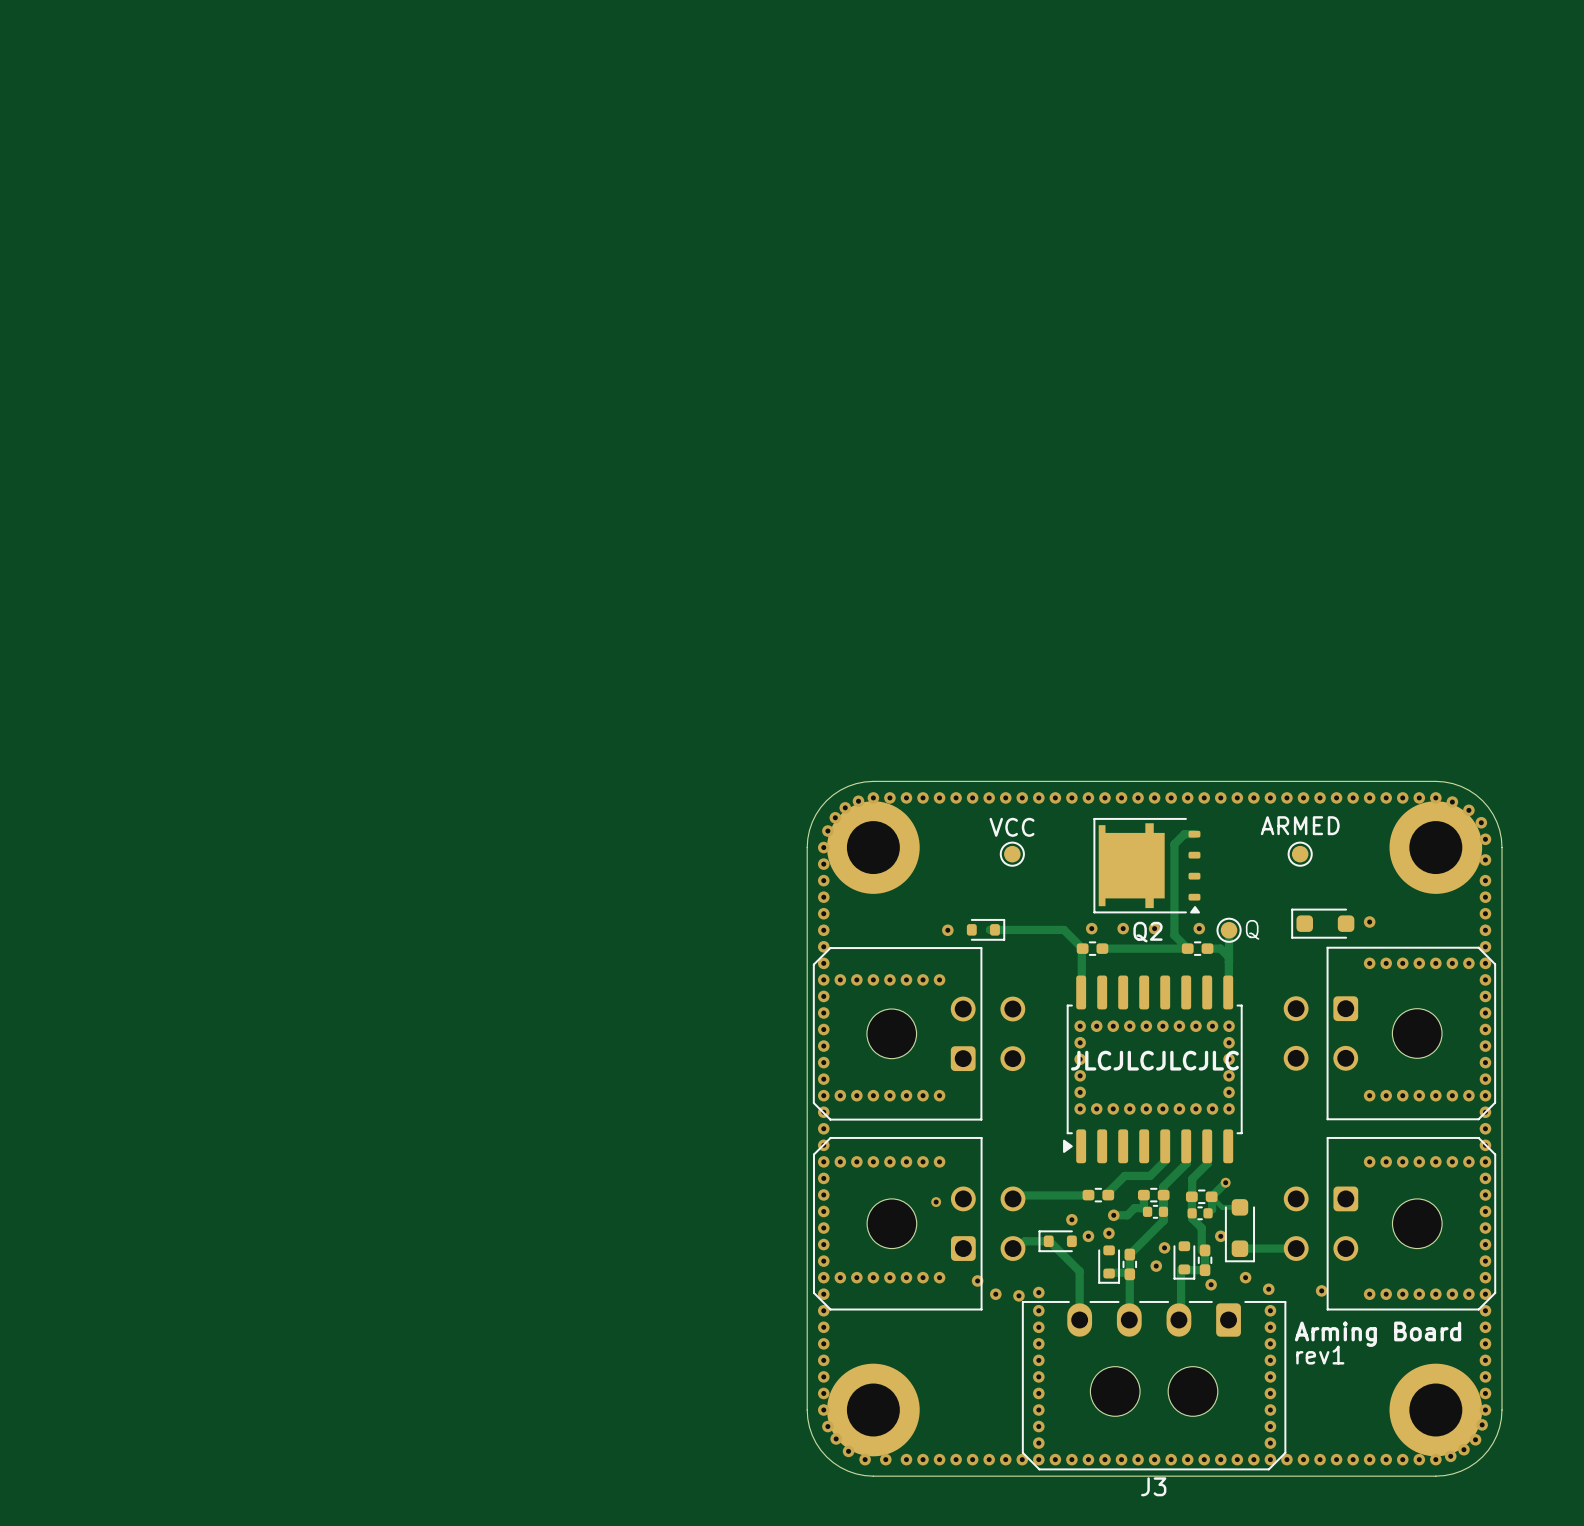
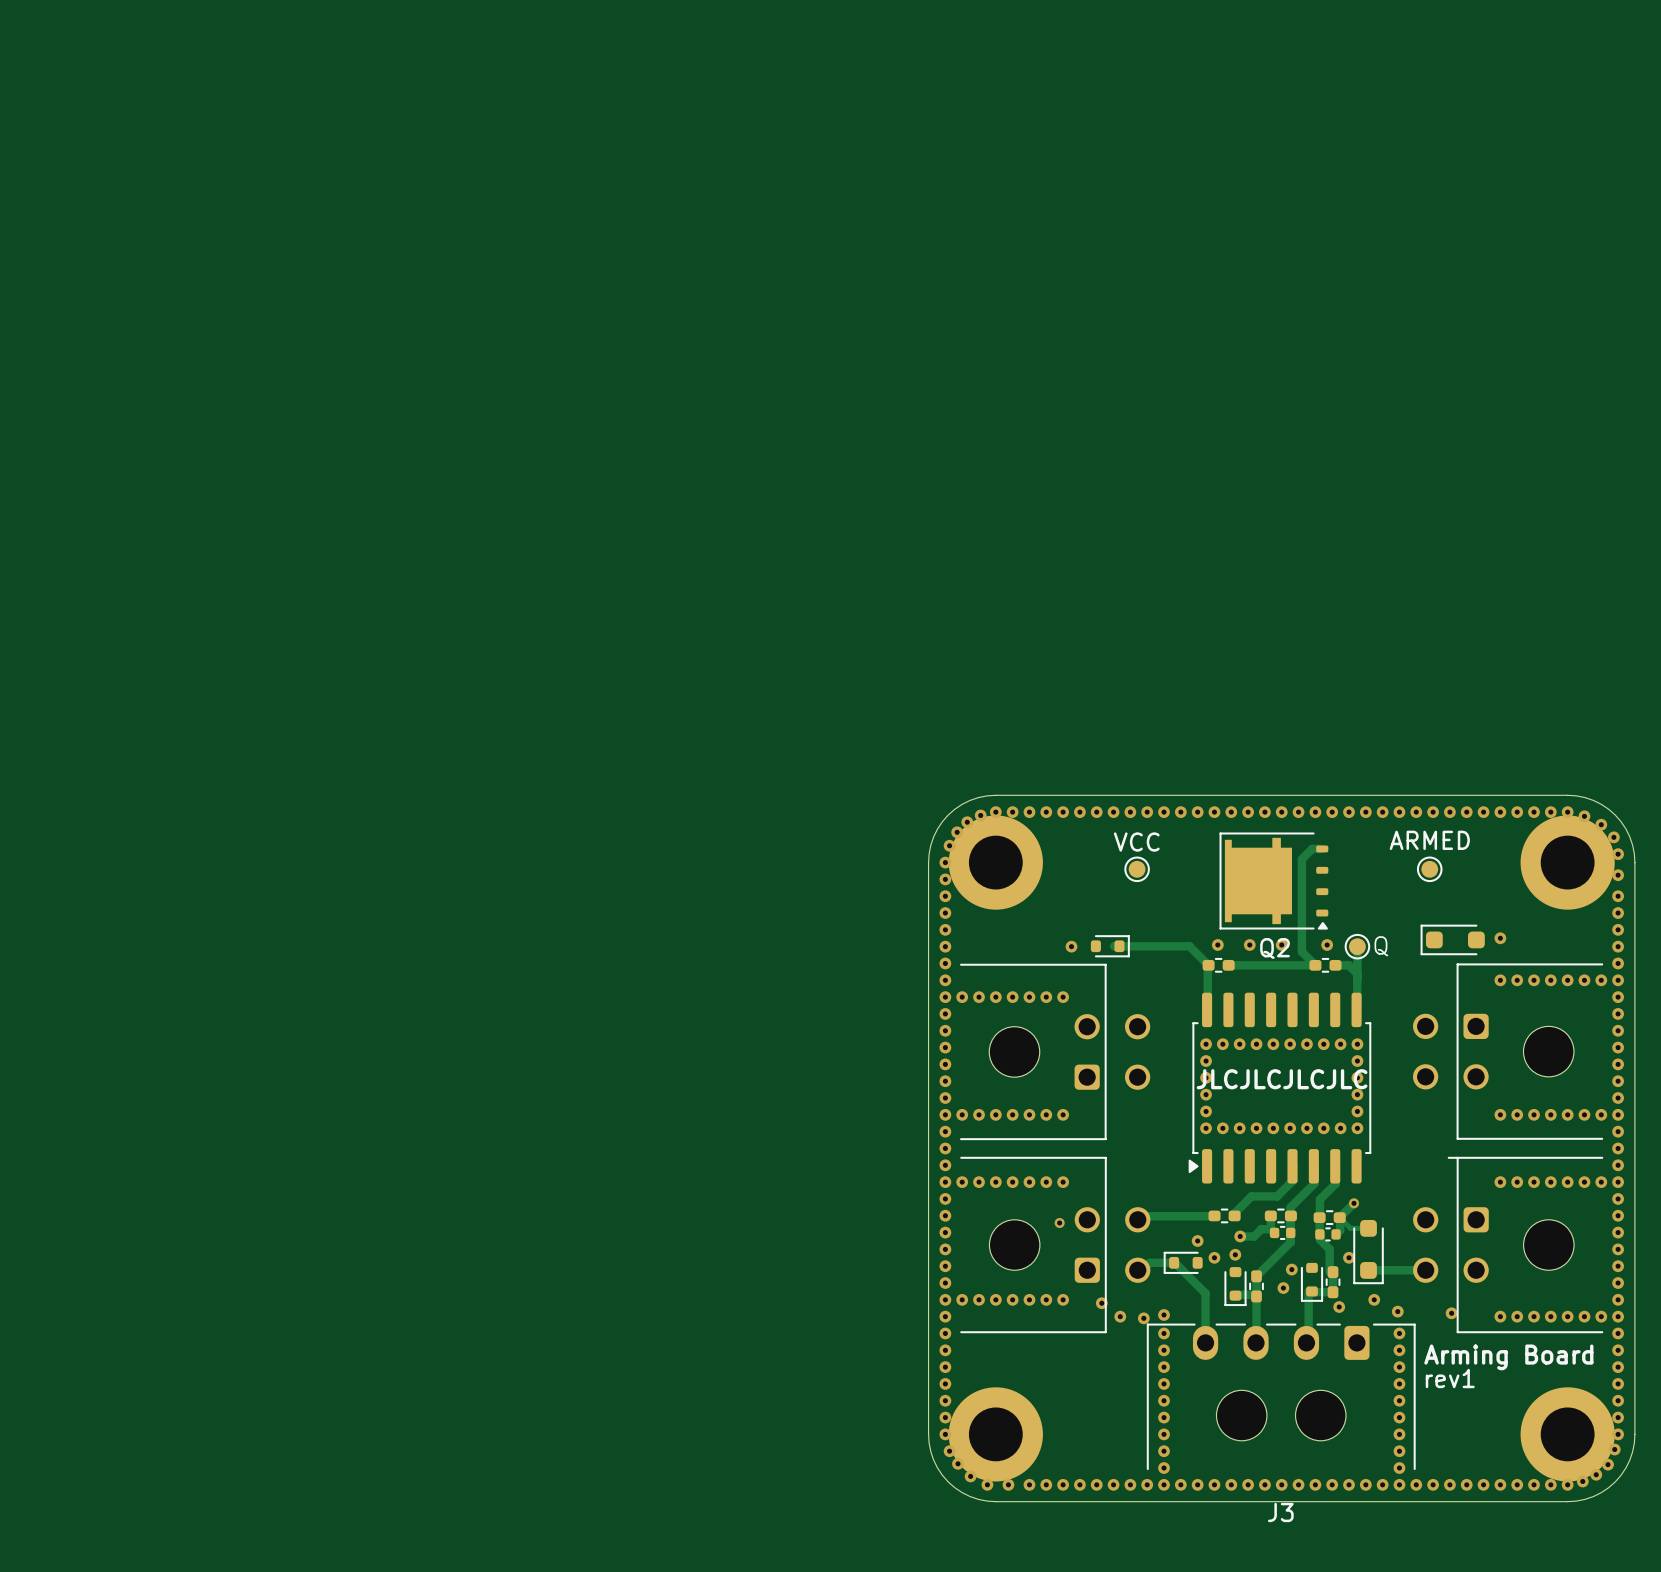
part footprint: [1283, 946, 1497, 1121] -> [1413, 963, 1604, 1140]
part footprint: [812, 947, 1026, 1121] -> [960, 963, 1151, 1141]
part footprint: [813, 1136, 1026, 1311] -> [960, 1156, 1151, 1334]
part footprint: [1283, 1136, 1497, 1311] -> [1413, 1156, 1604, 1334]
J3 footprint: [1021, 1300, 1287, 1471] -> [1146, 1323, 1416, 1471]

